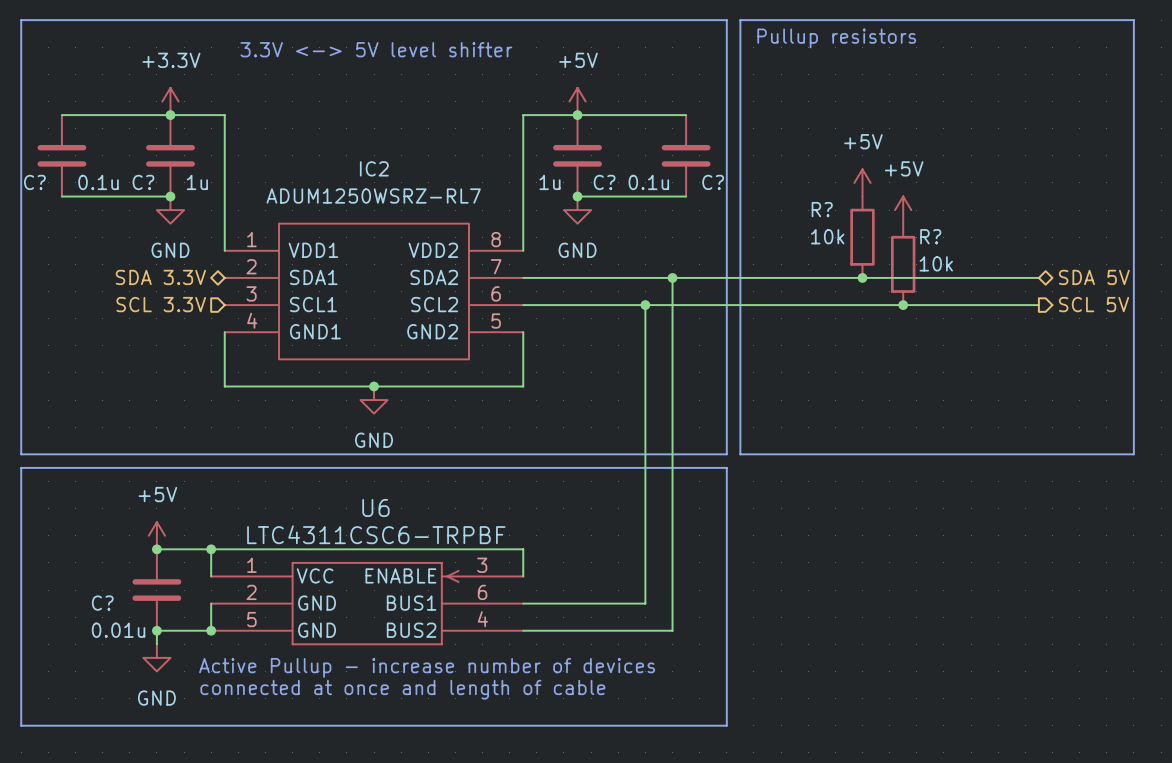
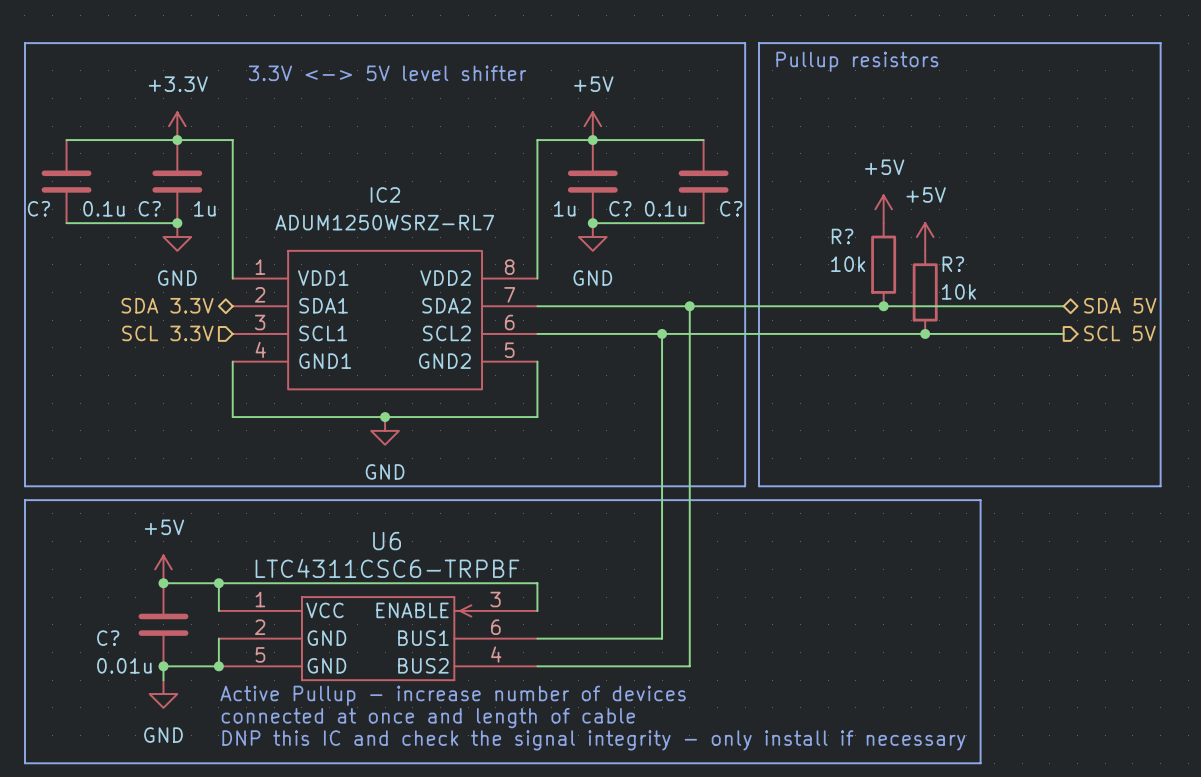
line: (726, 467) (726, 725) -> (745, 500) (980, 500) (980, 763) (745, 763)
text position: Active Pullup - increase number of devices (427, 667) -> Active Pullup - increase number of devices (453, 695)
text position: connected at once and length of cable (402, 689) -> connected at once and length of cable (428, 718)
text: none -> DNP this IC and check the signal integrity - only install if necessary (593, 740)

